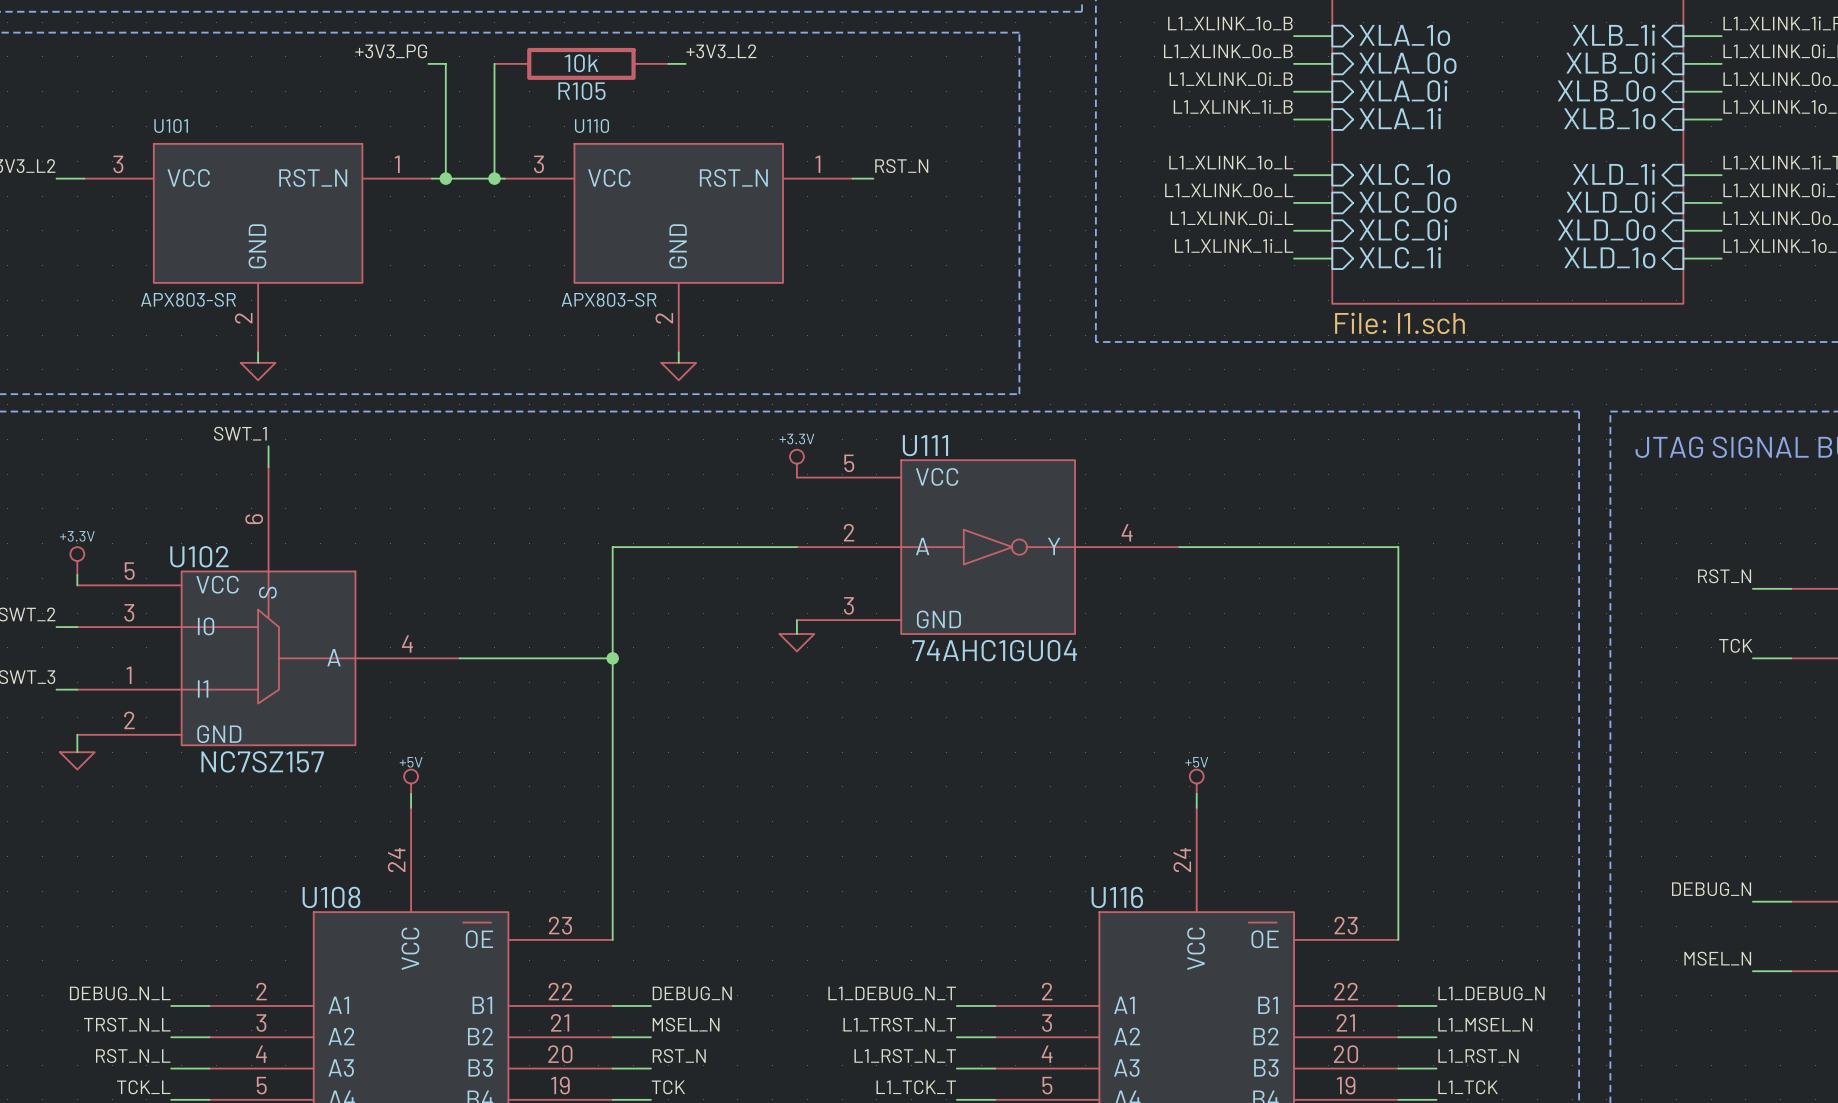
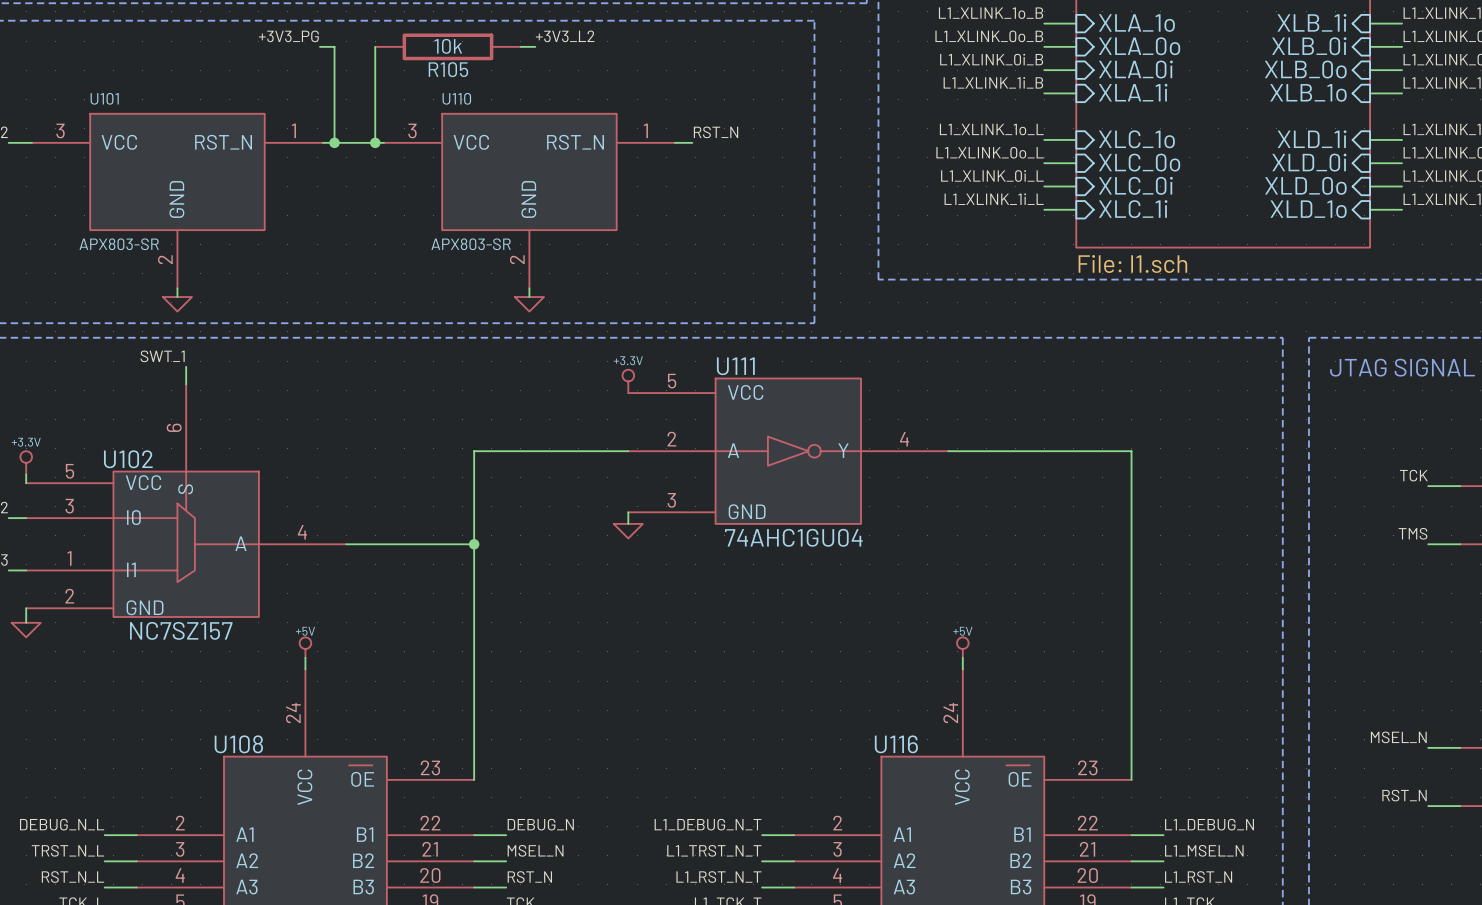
label: RST_N (1724, 576) -> TCK (1413, 475)
label: TCK (1735, 645) -> TMS (1413, 533)
label: DEBUG_N (1711, 889) -> MSEL_N (1398, 737)
label: MSEL_N (1717, 958) -> RST_N (1404, 795)

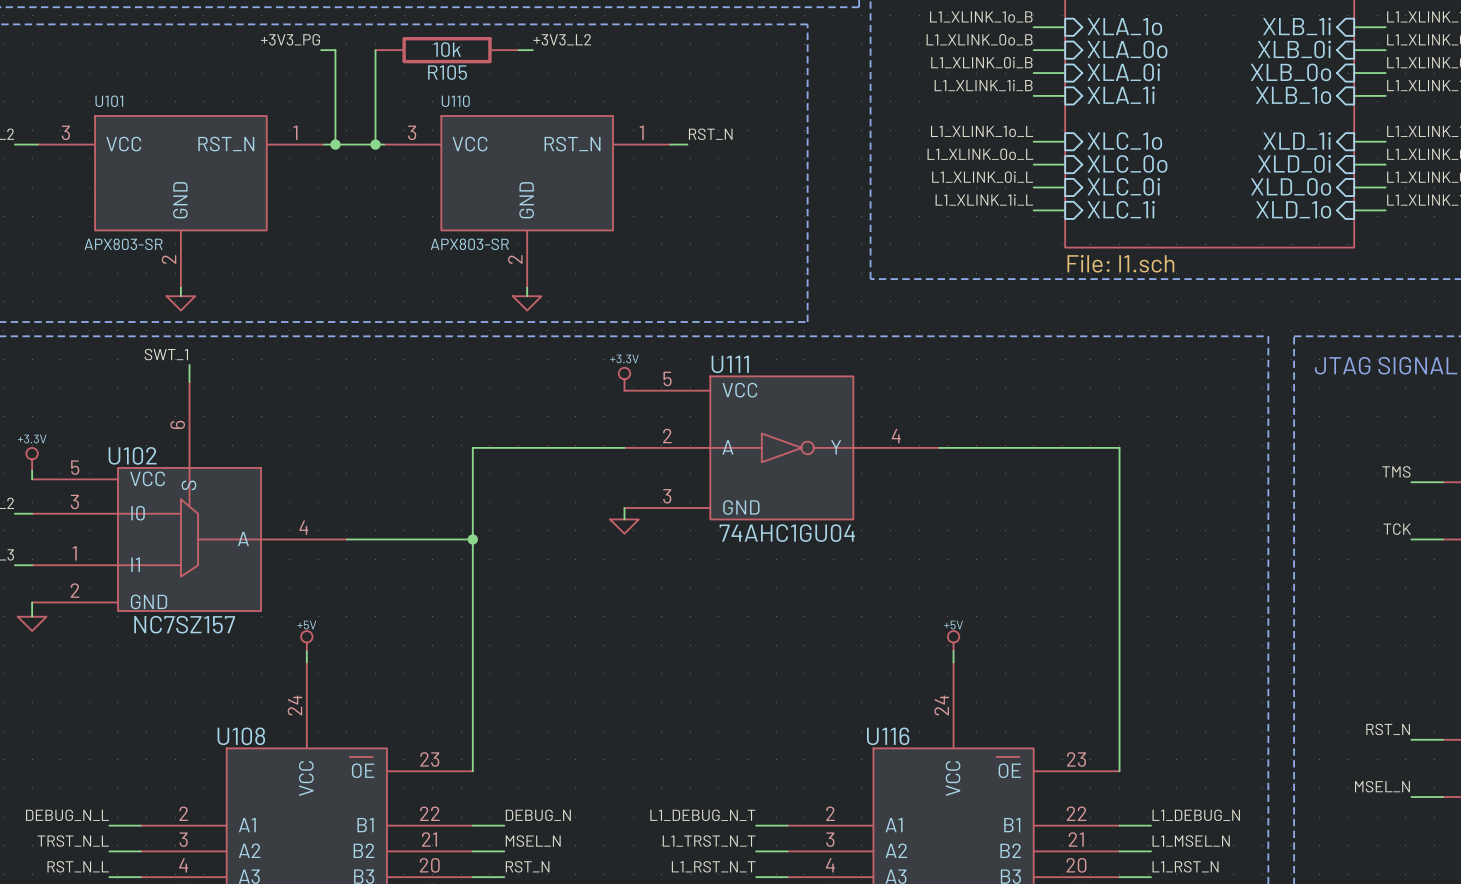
label: TCK (1413, 475) -> TMS (1396, 471)
label: TMS (1413, 533) -> TCK (1397, 529)
label: MSEL_N (1398, 737) -> RST_N (1388, 729)
label: RST_N (1404, 795) -> MSEL_N (1382, 786)

